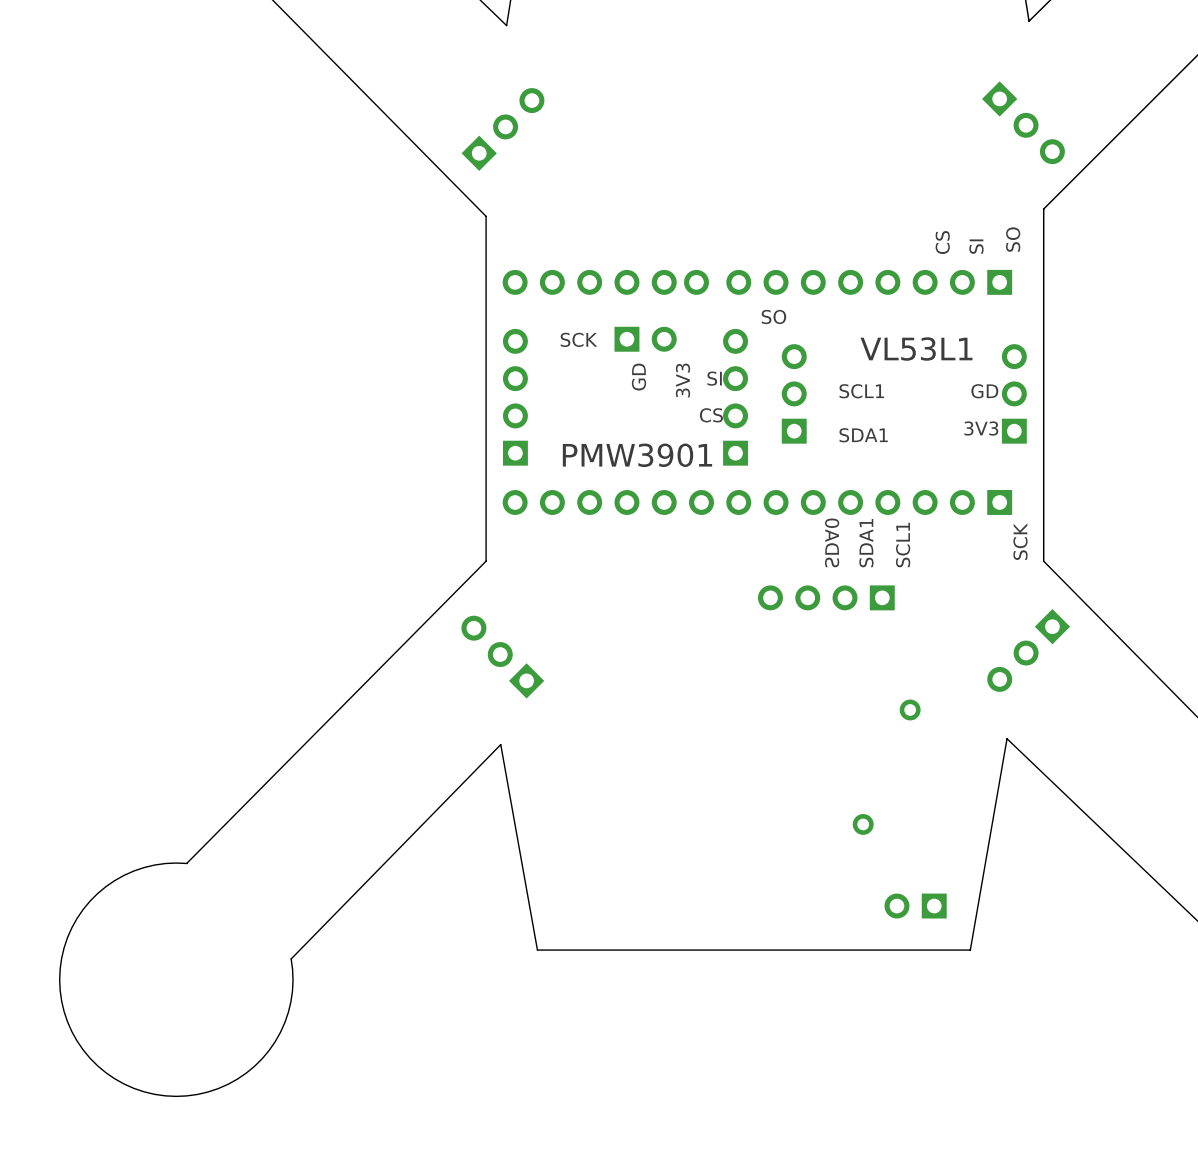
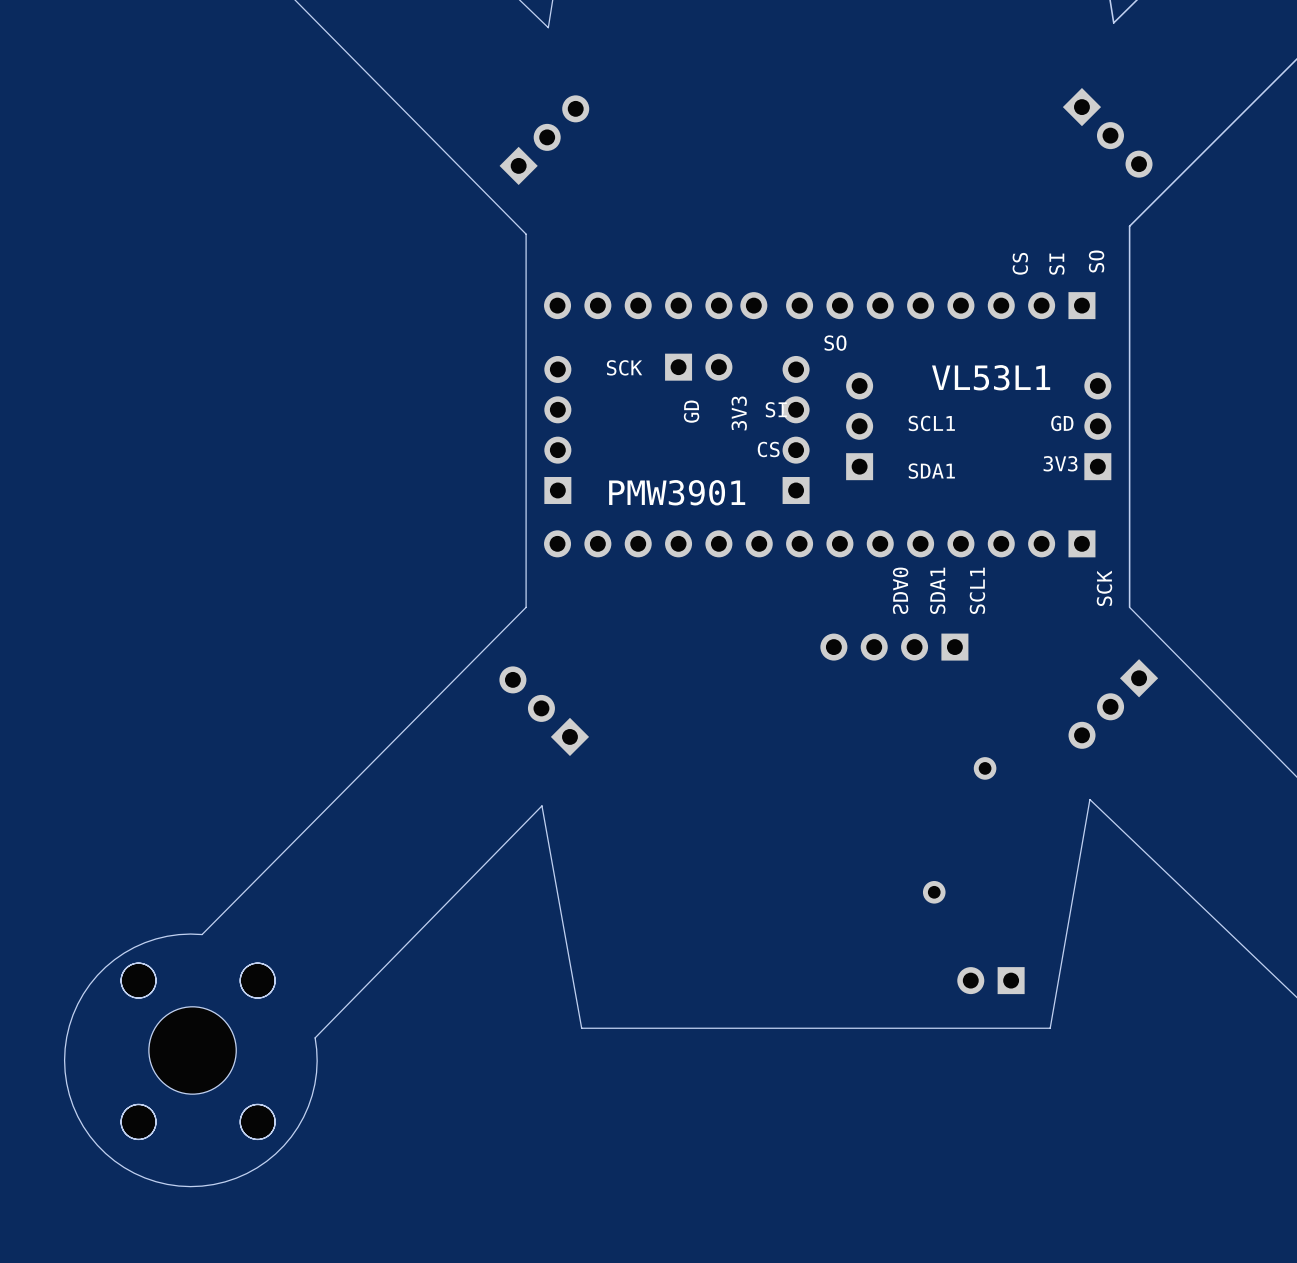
part: none -> (138, 980)
part: none -> (257, 980)
part: none -> (192, 1050)
part: none -> (138, 1121)
part: none -> (257, 1121)

